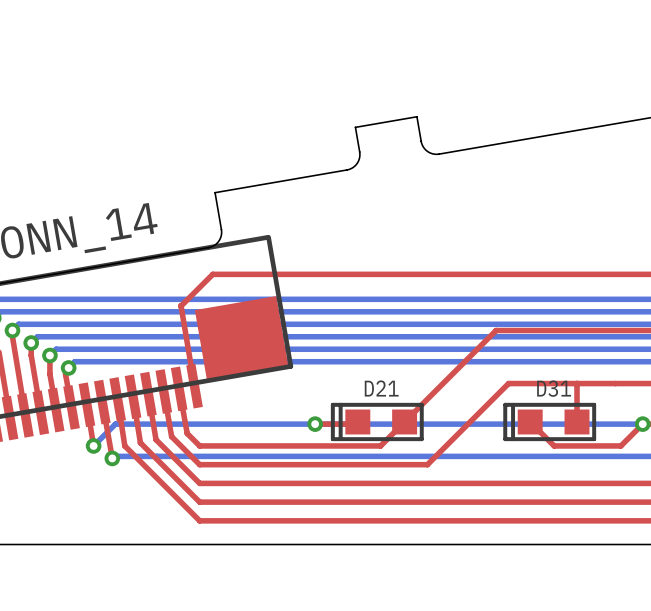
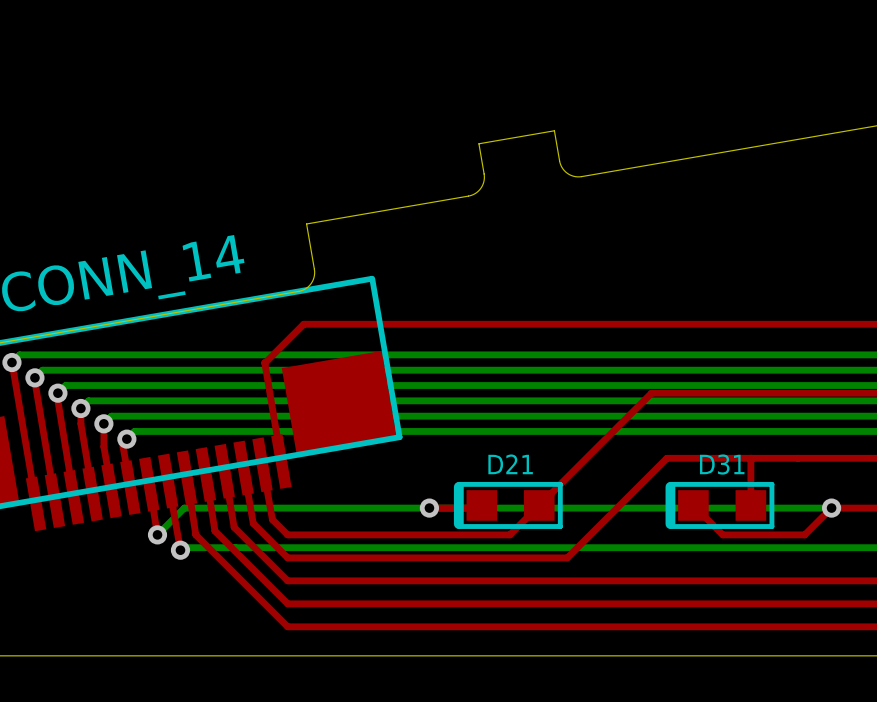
D21 footprint: [330, 402, 424, 442] -> [453, 481, 563, 529]
D31 footprint: [503, 402, 597, 442] -> [665, 481, 775, 529]

